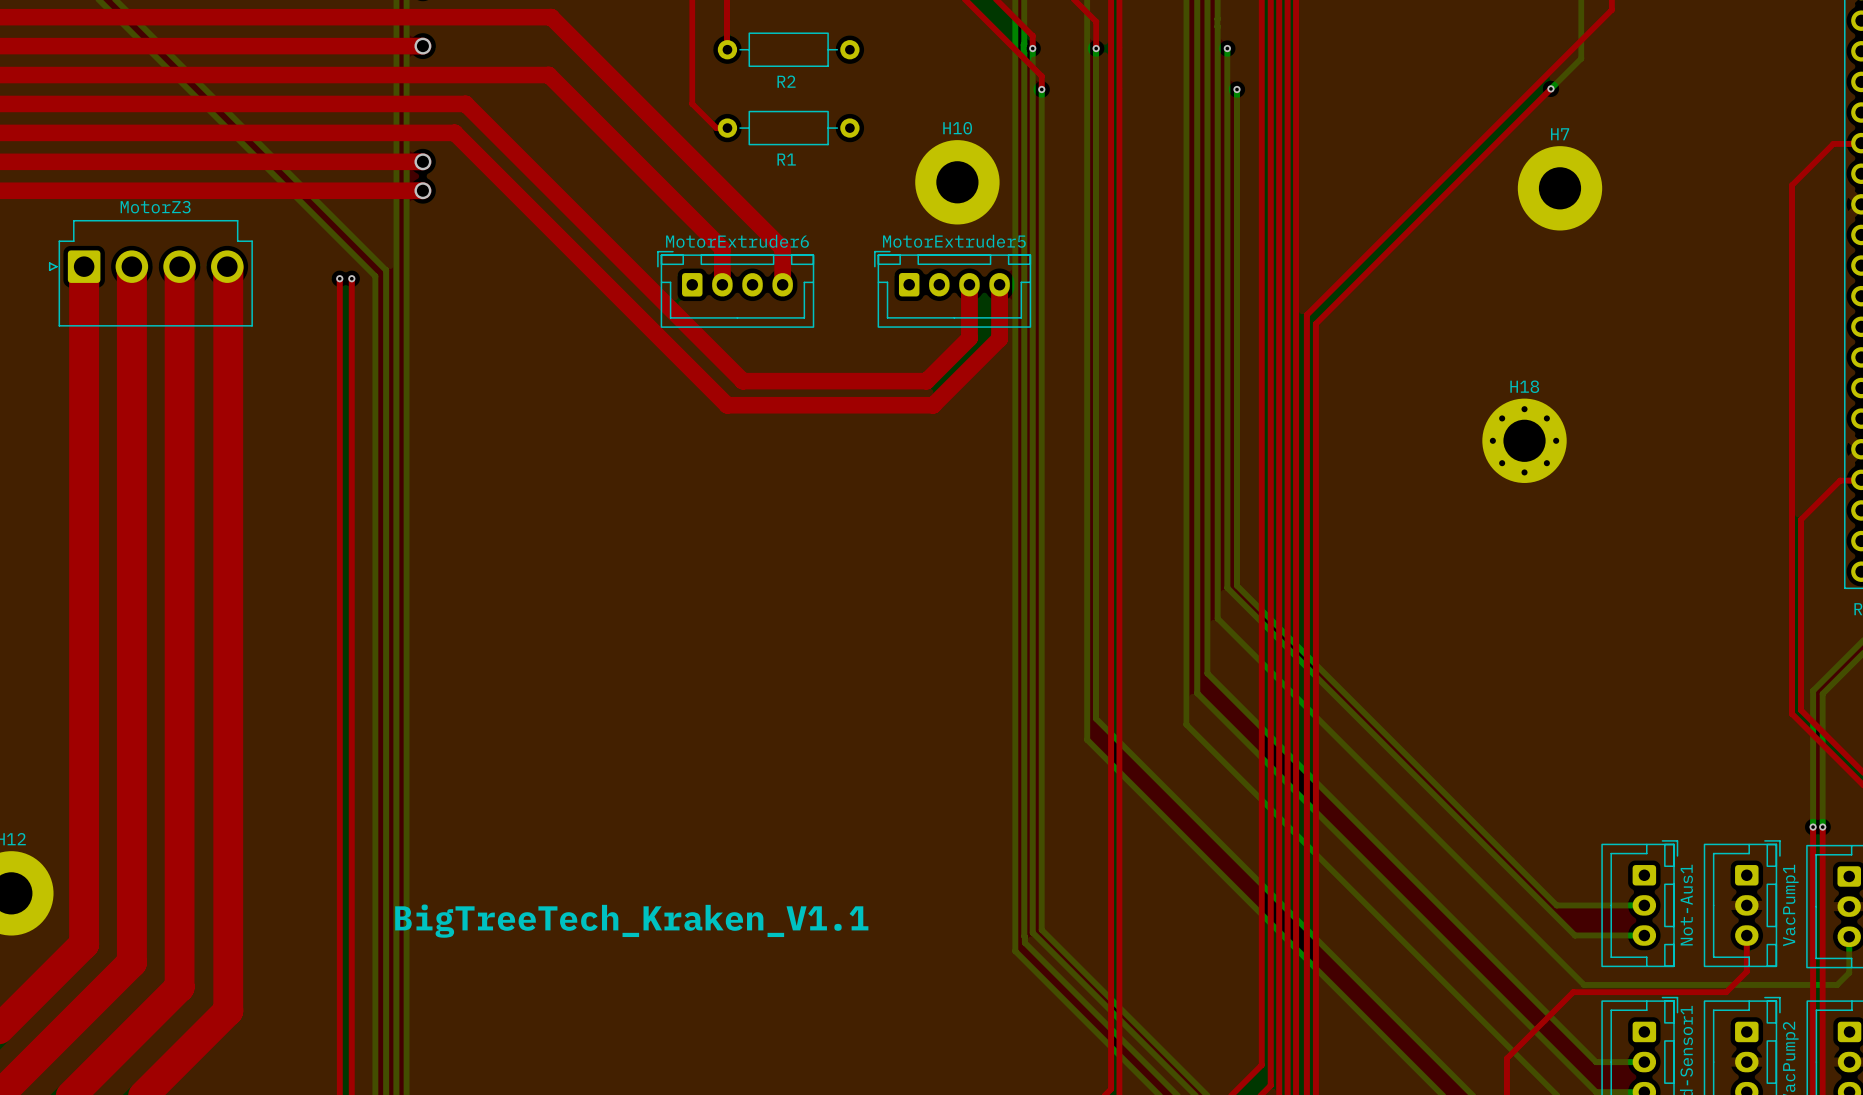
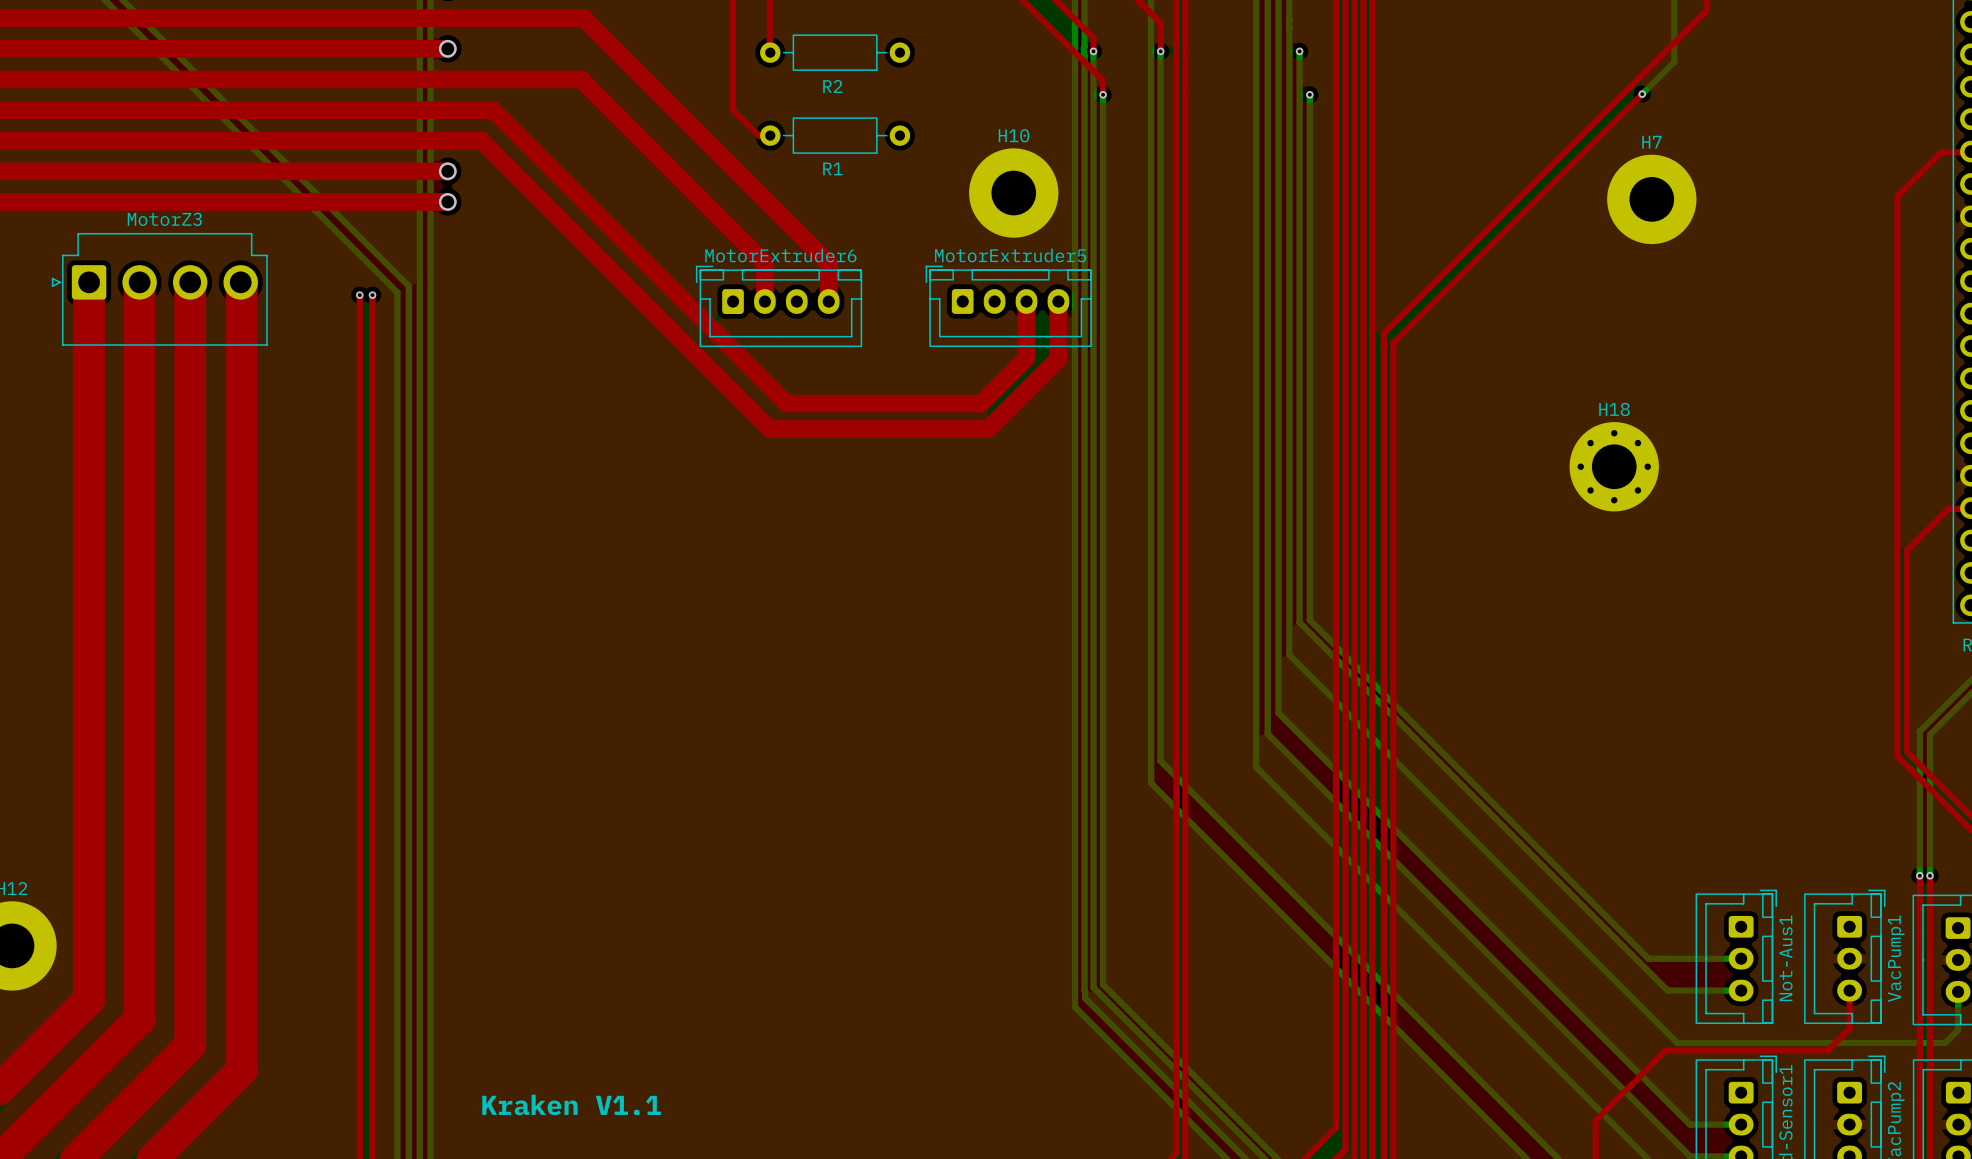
BigTreeTech_Kraken_V1.1: (631, 921) -> none
Kraken V1.1: none -> (571, 1104)

